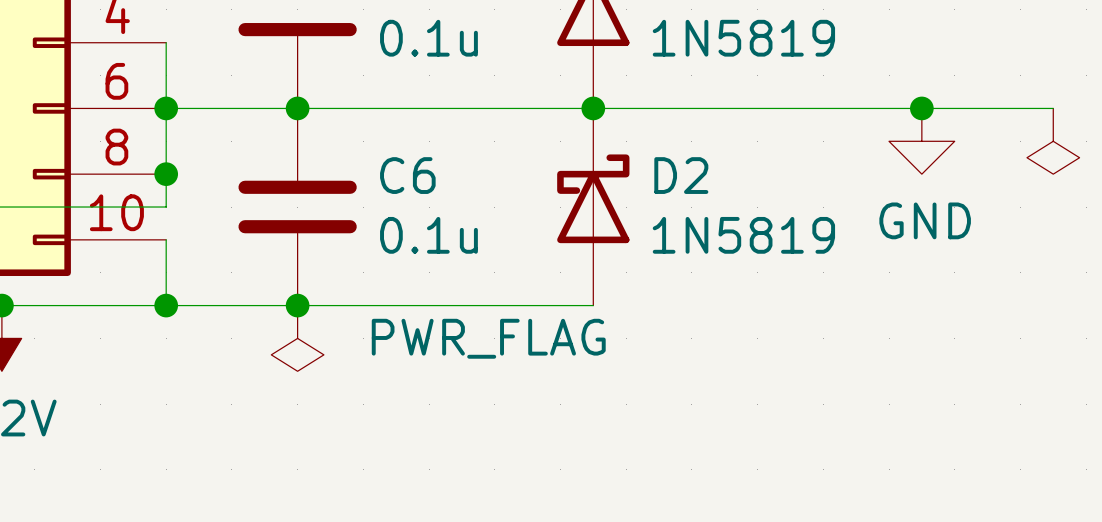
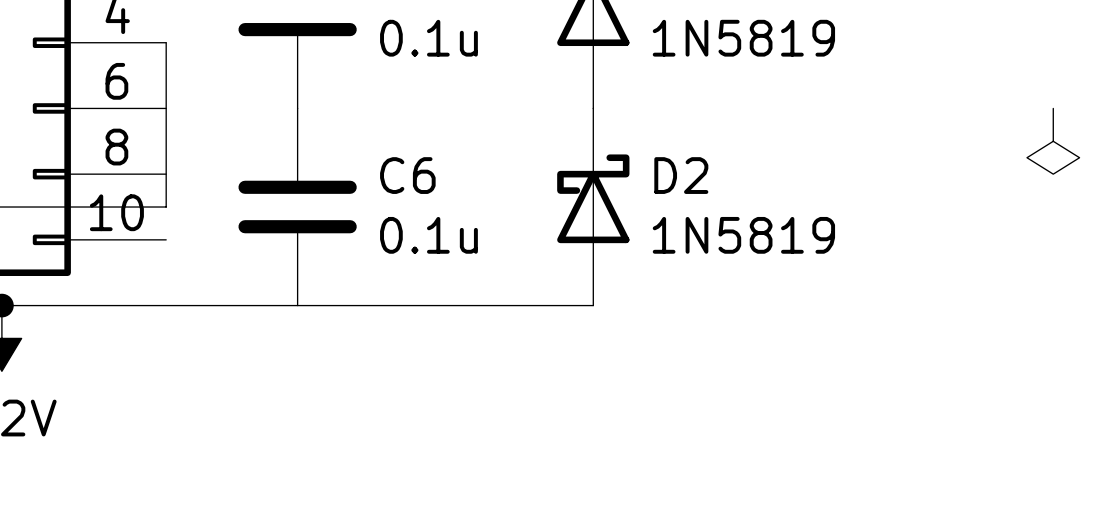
wire: (166, 108) (1053, 108) -> none
junction: (166, 108) -> none
junction: (297, 108) -> none
junction: (593, 108) -> none
junction: (921, 108) -> none
power symbol: GND (921, 141) -> none
junction: (166, 174) -> none
wire: (166, 239) (166, 305) -> none
junction: (166, 305) -> none
junction: (297, 305) -> none
power symbol: PWR_FLAG (297, 338) -> none

